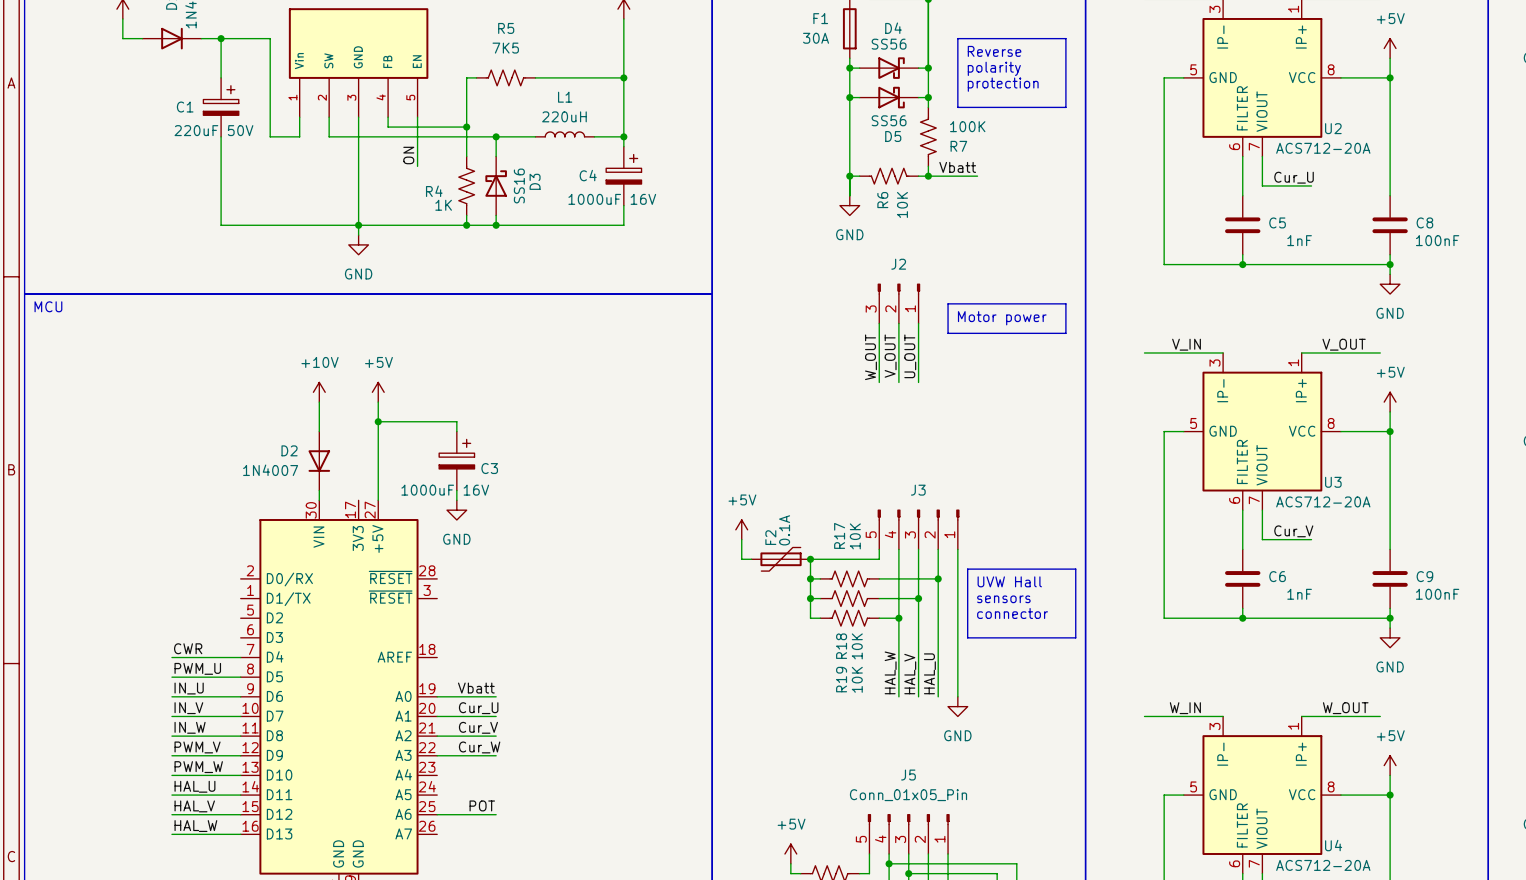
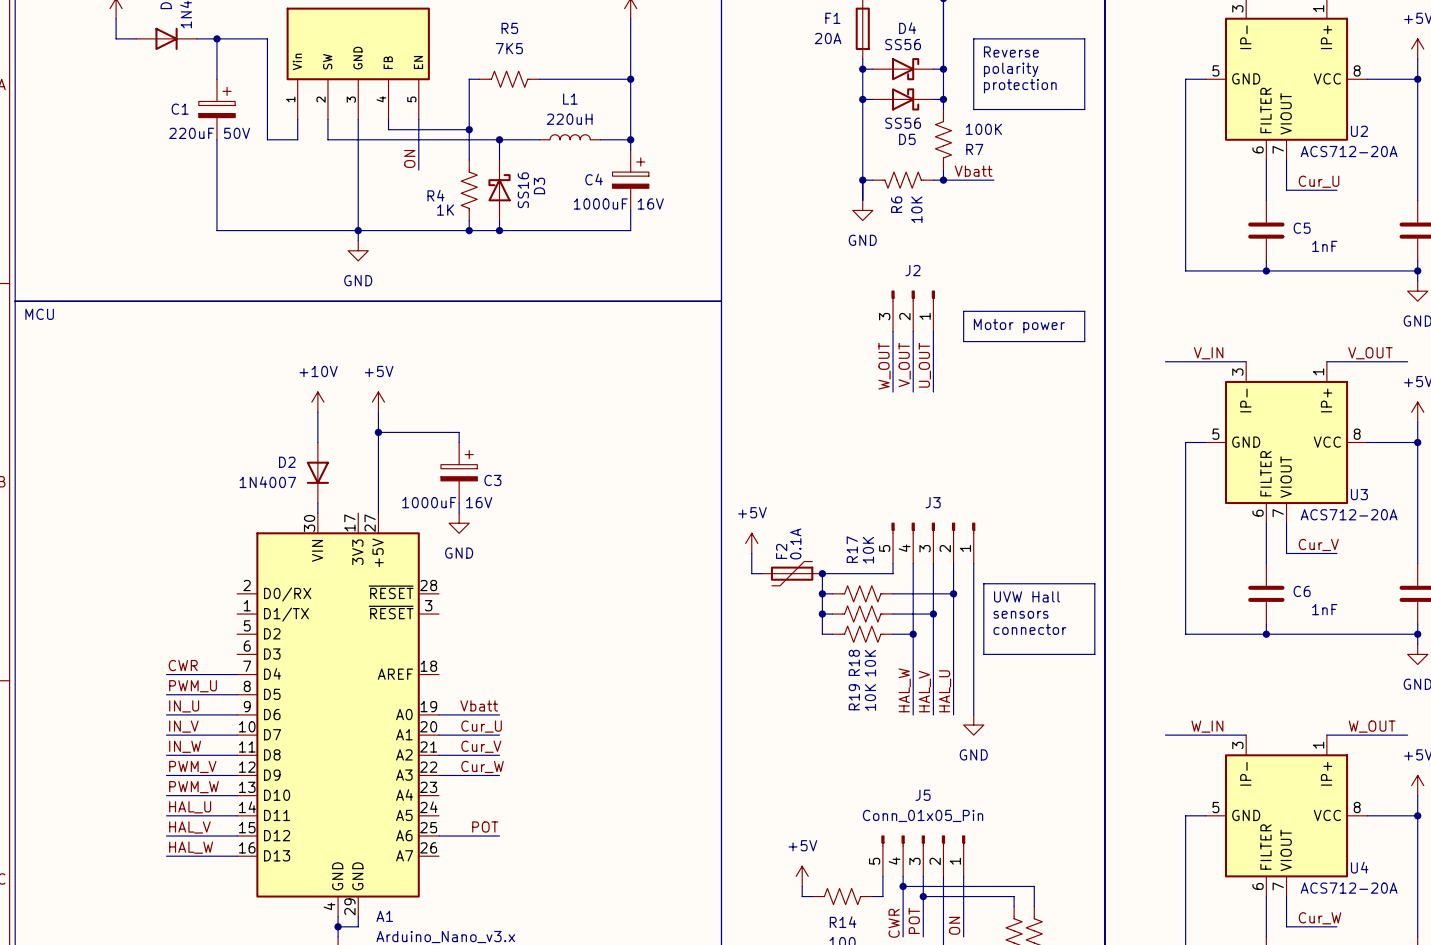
F1 value: 30A (816, 38) -> 20A (828, 38)

